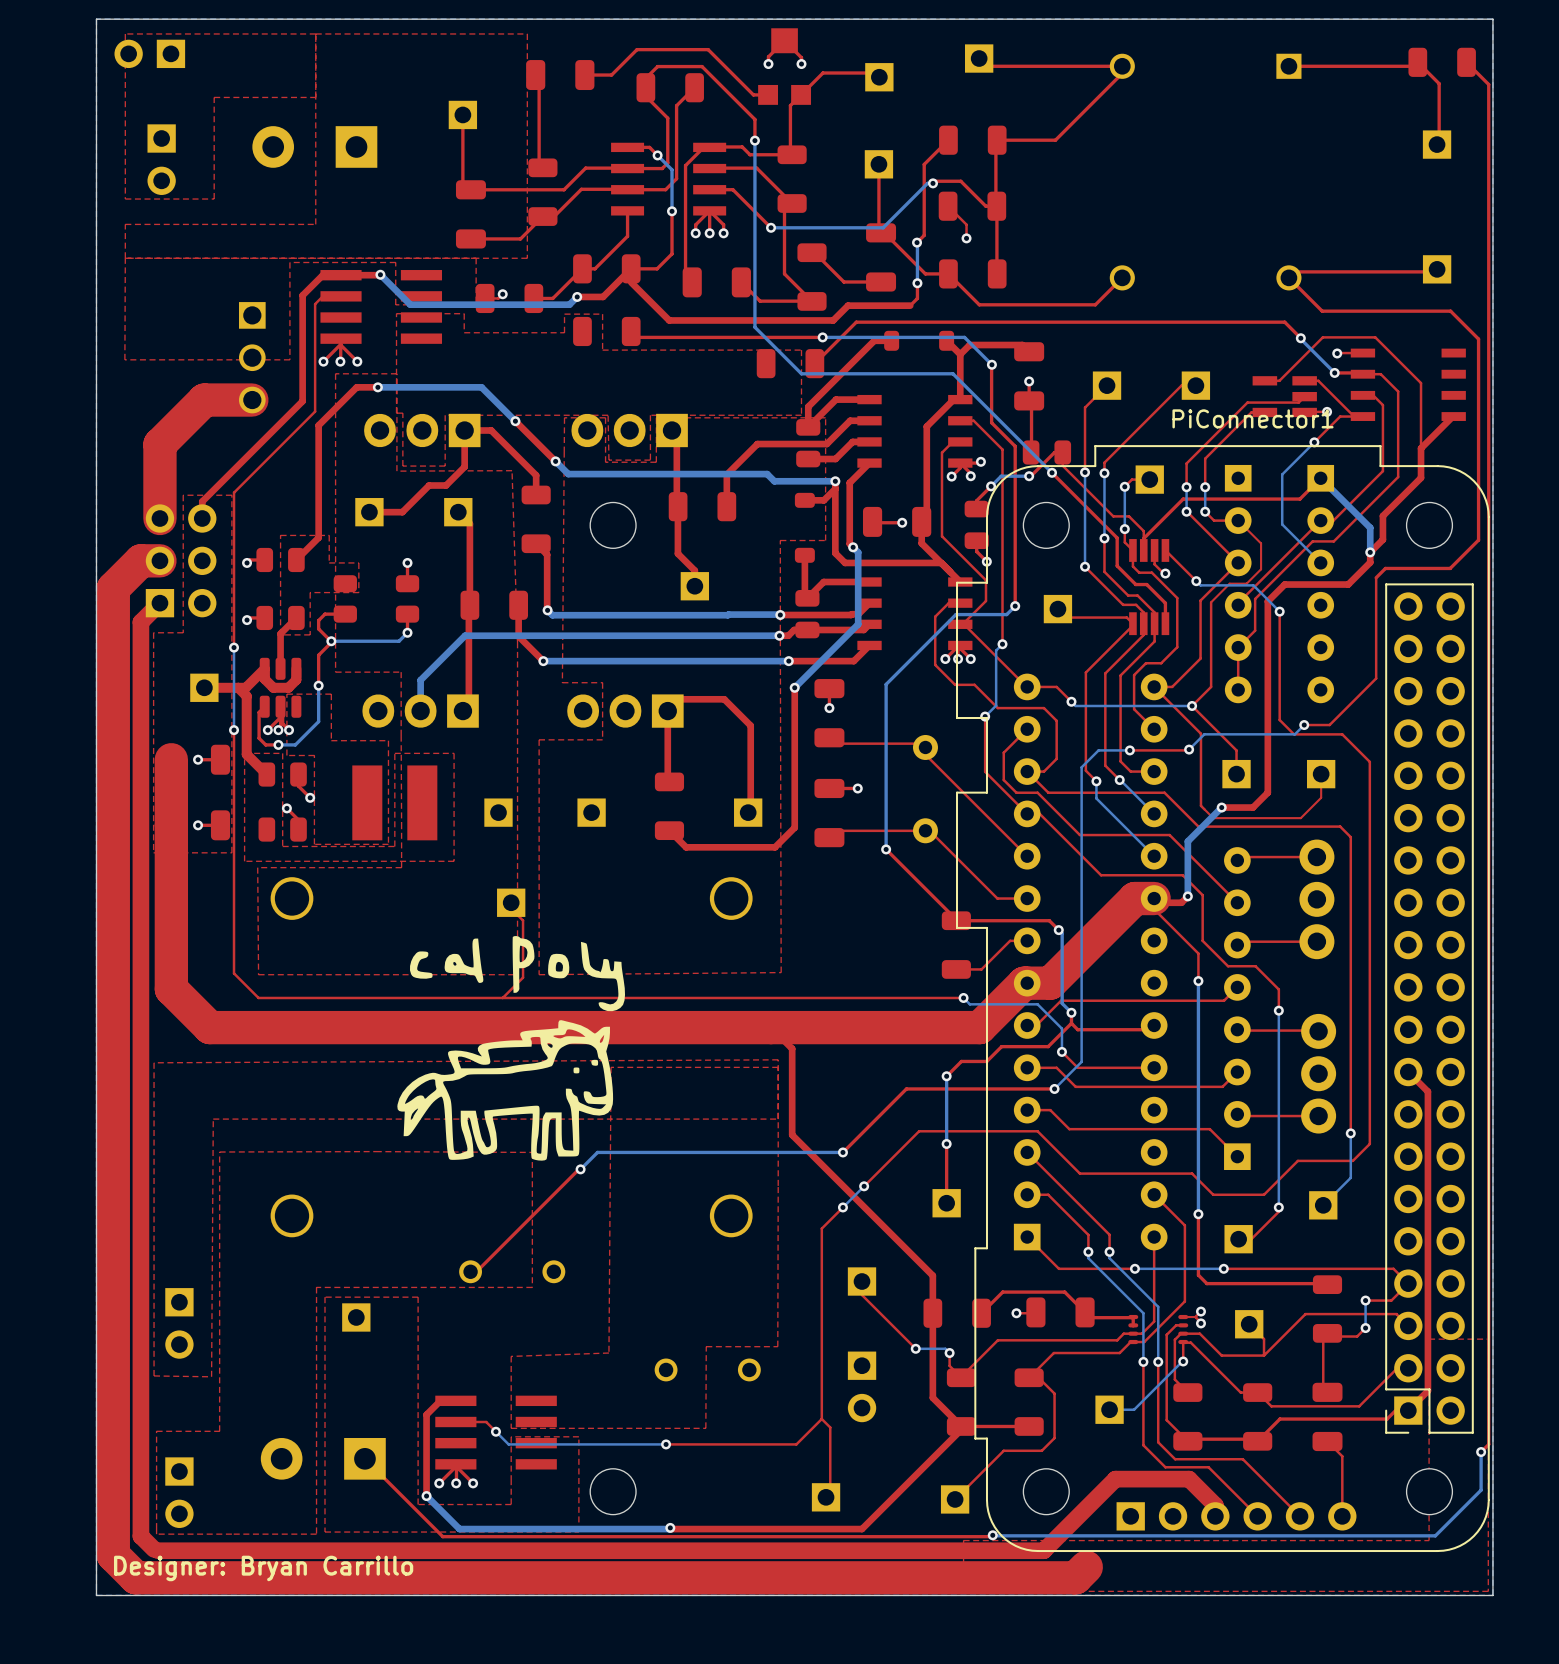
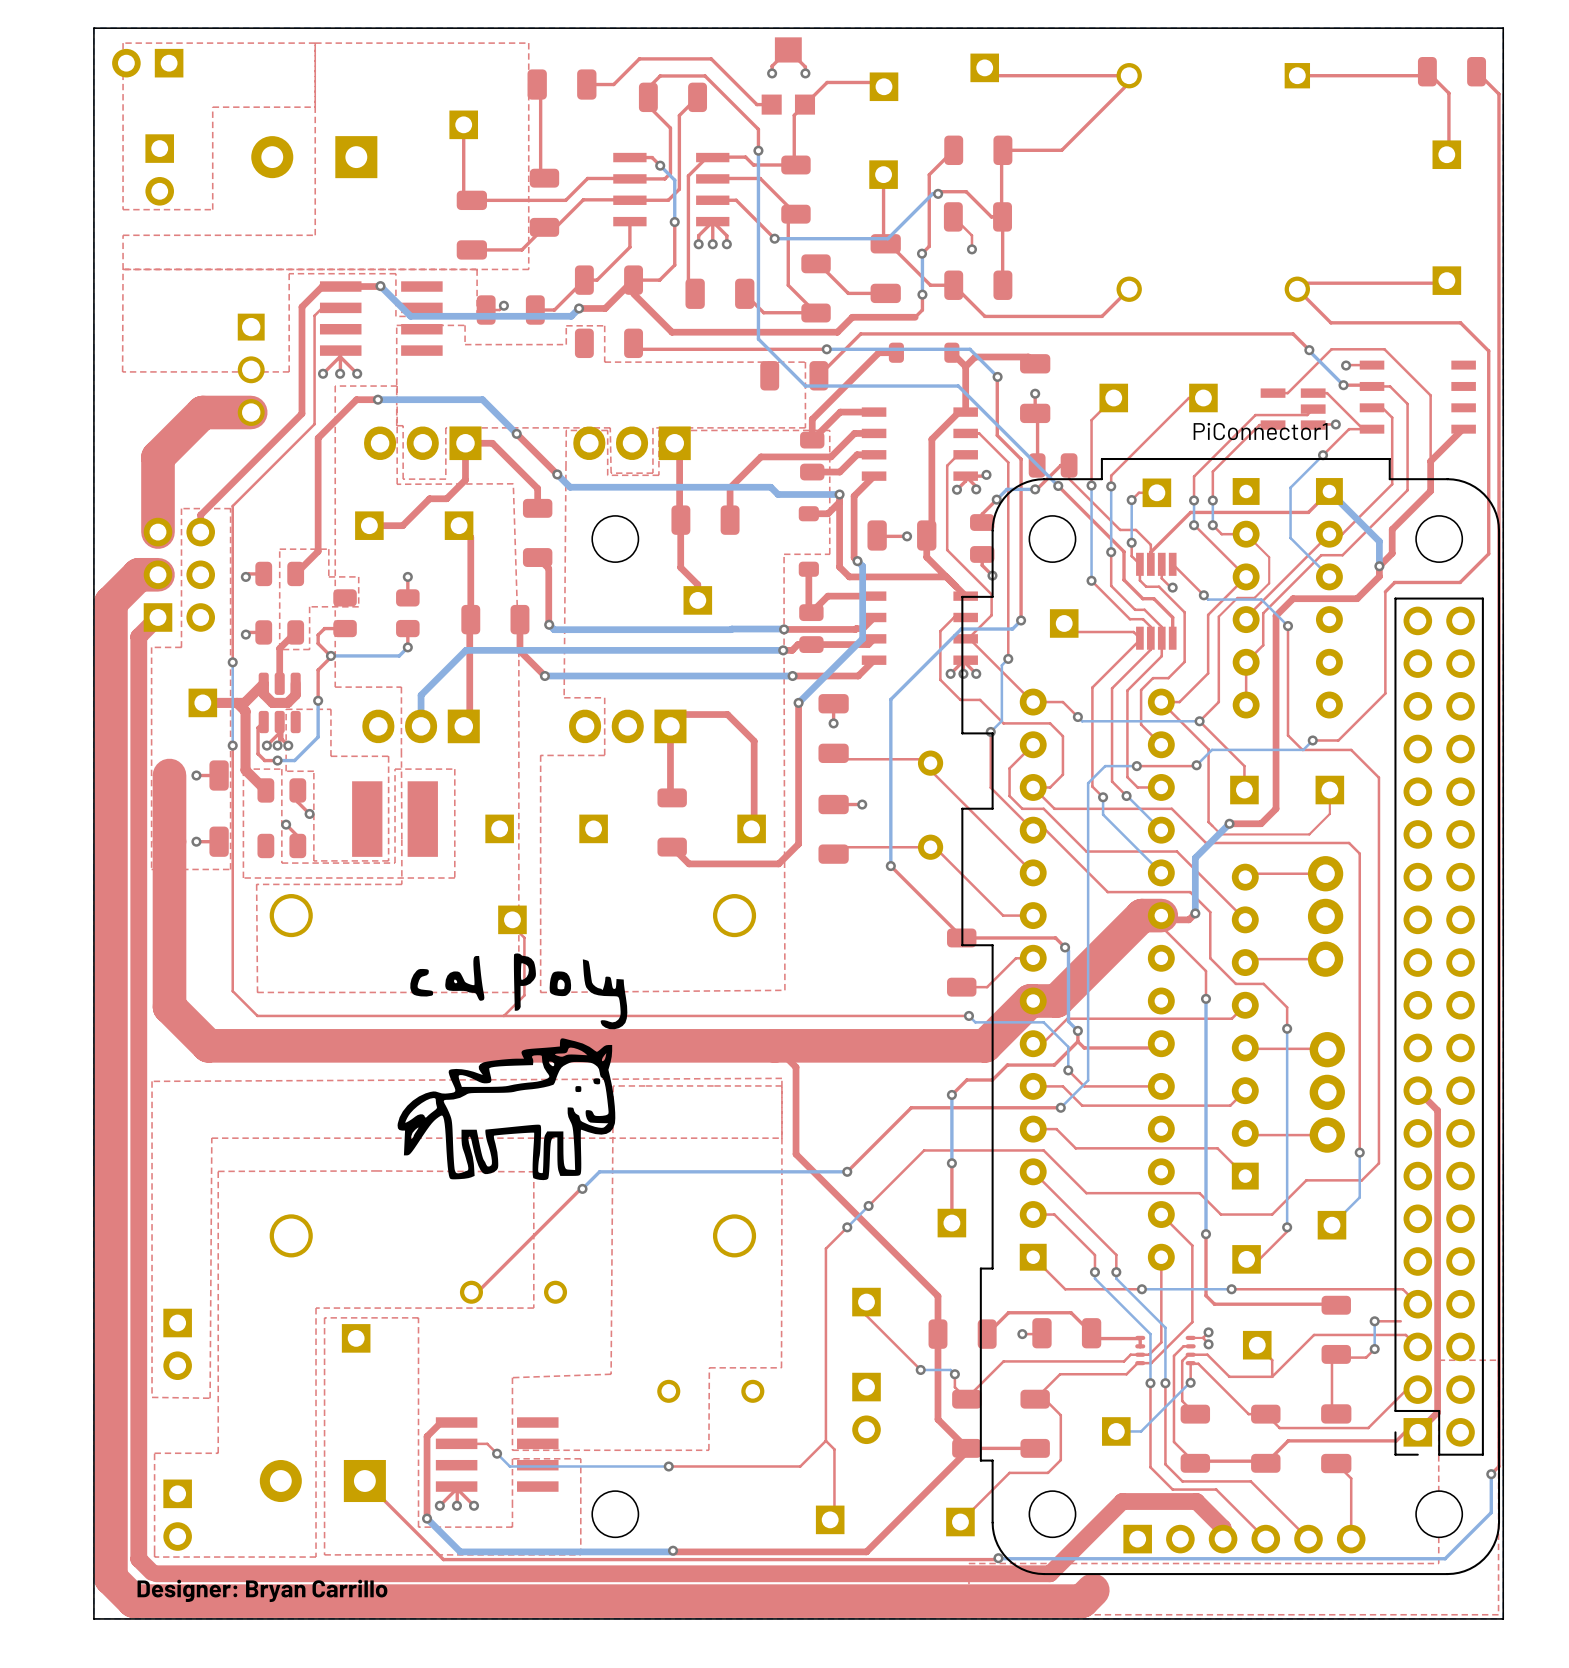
top track: (1408, 1283) (1391, 1300) -> none

